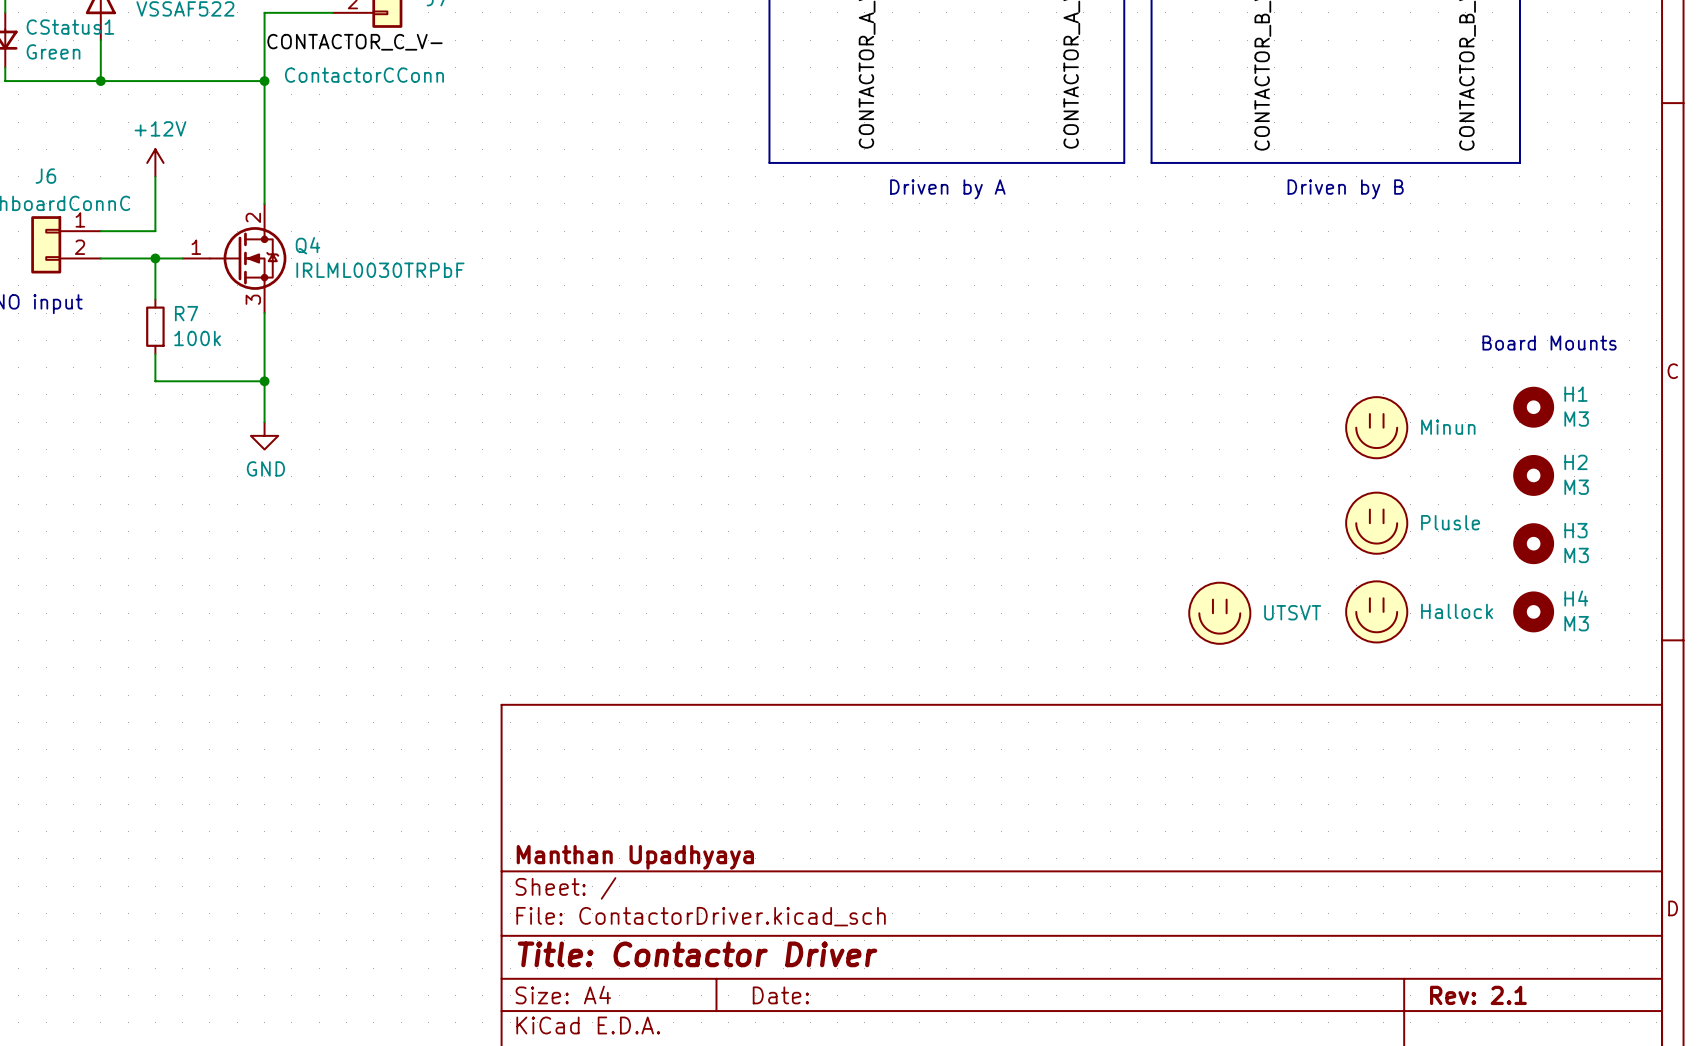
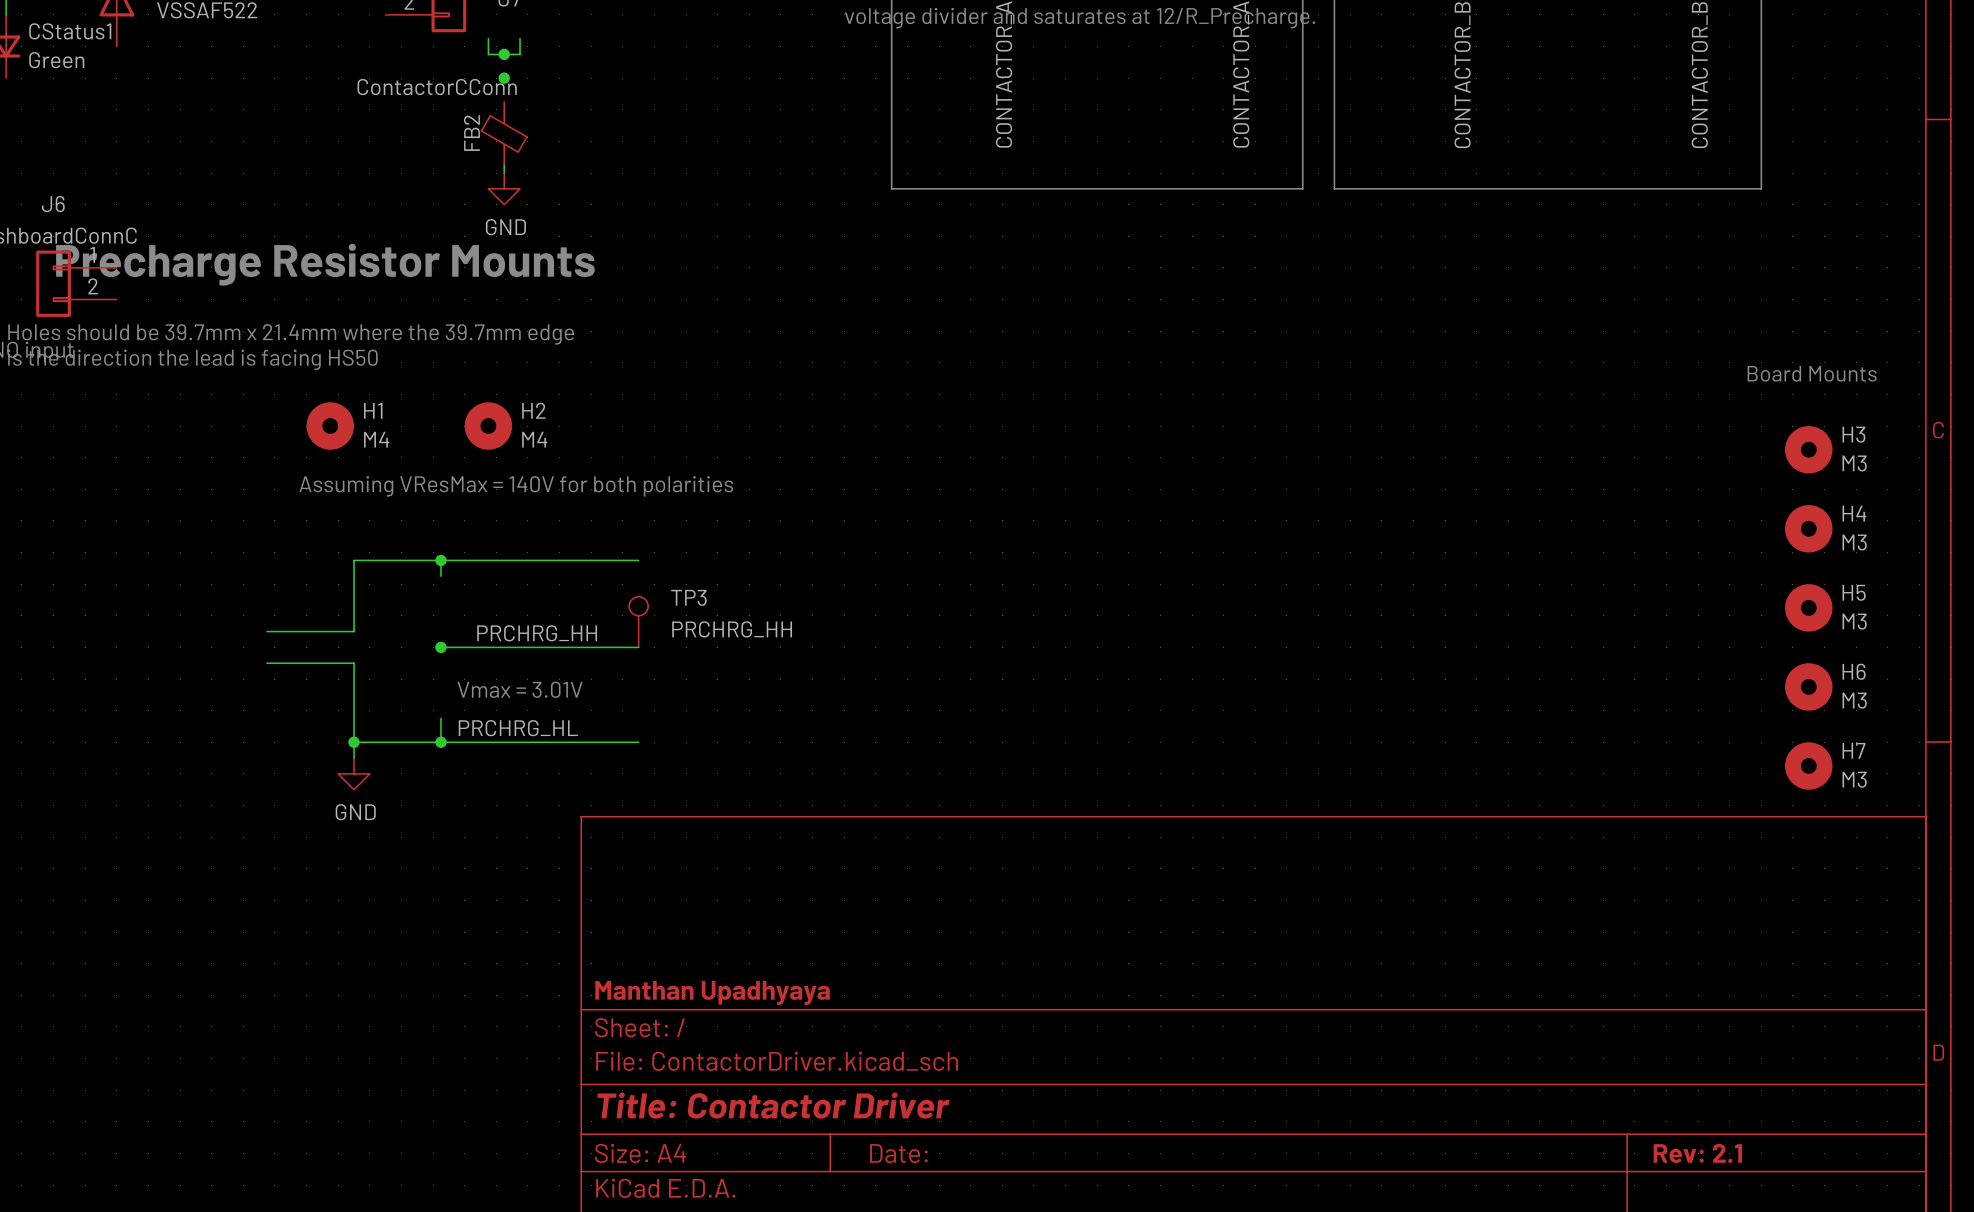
wire: (332, 12) (264, 12) (264, 203) -> none
text: none -> voltage divider and saturates at 12/R_Precharge. (1080, 18)
wire: none -> (488, 38) (488, 54) (520, 54) (520, 38)
wire: (100, 40) (100, 81) -> none
label: CONTACTOR_C_V- (354, 42) -> none
junction: none -> (504, 54)
wire: (5, 67) (5, 81) (264, 81) -> none
junction: none -> (504, 78)
junction: (100, 81) -> none
junction: (264, 81) -> none
FB2: none -> (504, 133)
wire: none -> (504, 165) (504, 173)
power symbol: +12V (155, 162) -> none
power symbol: none -> GND (504, 188)
wire: (155, 176) (155, 231) (100, 231) -> none
text: Driven by A (947, 189) -> none
text: Driven by B (1345, 189) -> none
text: none -> Precharge Resistor Mounts (325, 264)
wire: (100, 258) (182, 258) -> none
wire: (155, 258) (155, 299) -> none
junction: (155, 258) -> none
Q4: IRLML0030TRPbF (234, 258) -> none
text: none -> Holes should be 39.7mm x 21.4mm where the 39.7mm edge (291, 334)
text: none -> is the direction the lead is facing HS50 (192, 359)
wire: (264, 313) (264, 422) -> none
R7: 100k (155, 326) -> none
text position: Board Mounts (1549, 342) -> Board Mounts (1812, 373)
wire: (155, 353) (155, 381) (264, 381) -> none
junction: (264, 381) -> none
H1 position: (1533, 407) -> (330, 426)
H1 value: M3 (1576, 418) -> M4 (376, 439)
text: none -> Assuming VResMax = 140V for both polarities (516, 486)
part: Minun (1376, 427) -> none
power symbol: GND (264, 435) -> none
H2 position: (1533, 475) -> (488, 426)
wire: none -> (440, 560) (440, 576)
junction: none -> (440, 560)
wire: none -> (638, 560) (354, 560) (354, 631) (267, 631)
H2 value: M3 (1576, 487) -> M4 (534, 439)
part: Plusle (1376, 523) -> none
H5: none -> M3 (1808, 607)
TP3: none -> PRCHRG_HH (638, 622)
H3 position: (1533, 543) -> (1808, 449)
label: none -> PRCHRG_HH (537, 633)
wire: none -> (440, 647) (638, 647)
junction: none -> (440, 647)
wire: none -> (267, 663) (354, 663) (354, 758)
H6: none -> M3 (1808, 686)
text: none -> Vmax = 3.01V (520, 689)
part: Hallock (1376, 611) -> none
H4 position: (1533, 611) -> (1808, 528)
part: UTSVT (1219, 613) -> none
wire: none -> (440, 718) (440, 742)
label: none -> PRCHRG_HL (518, 728)
wire: none -> (354, 742) (638, 742)
junction: none -> (354, 742)
junction: none -> (440, 742)
H7: none -> M3 (1808, 765)
power symbol: none -> GND (354, 773)

